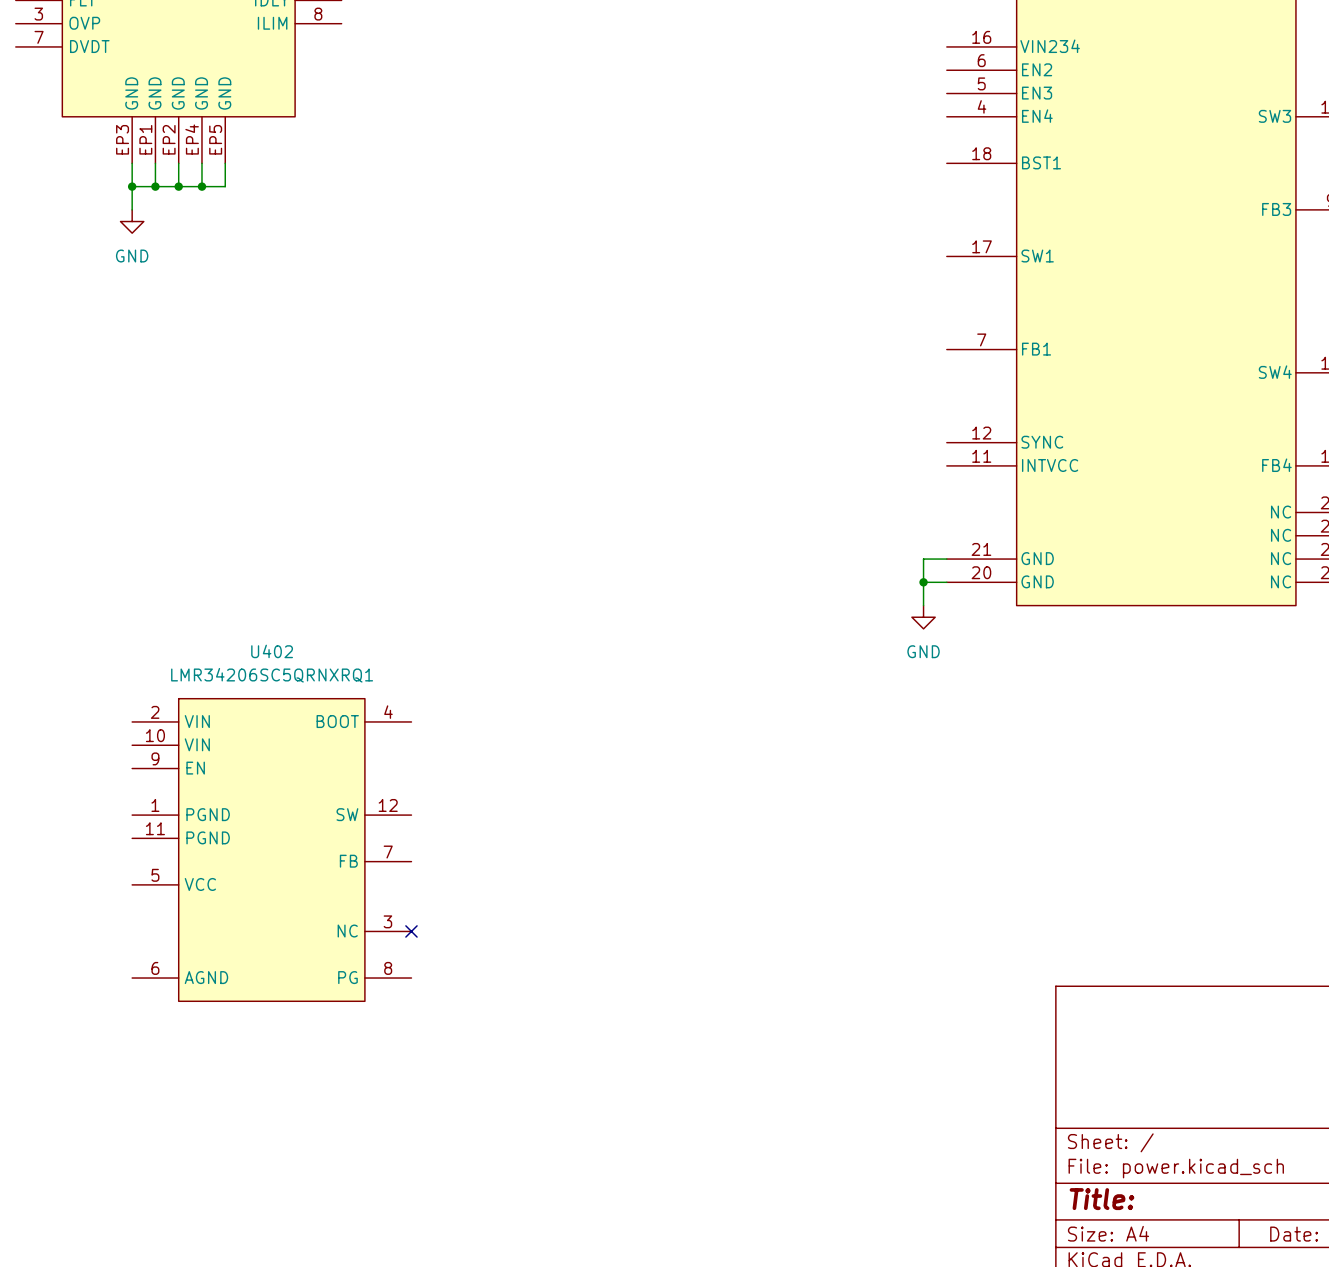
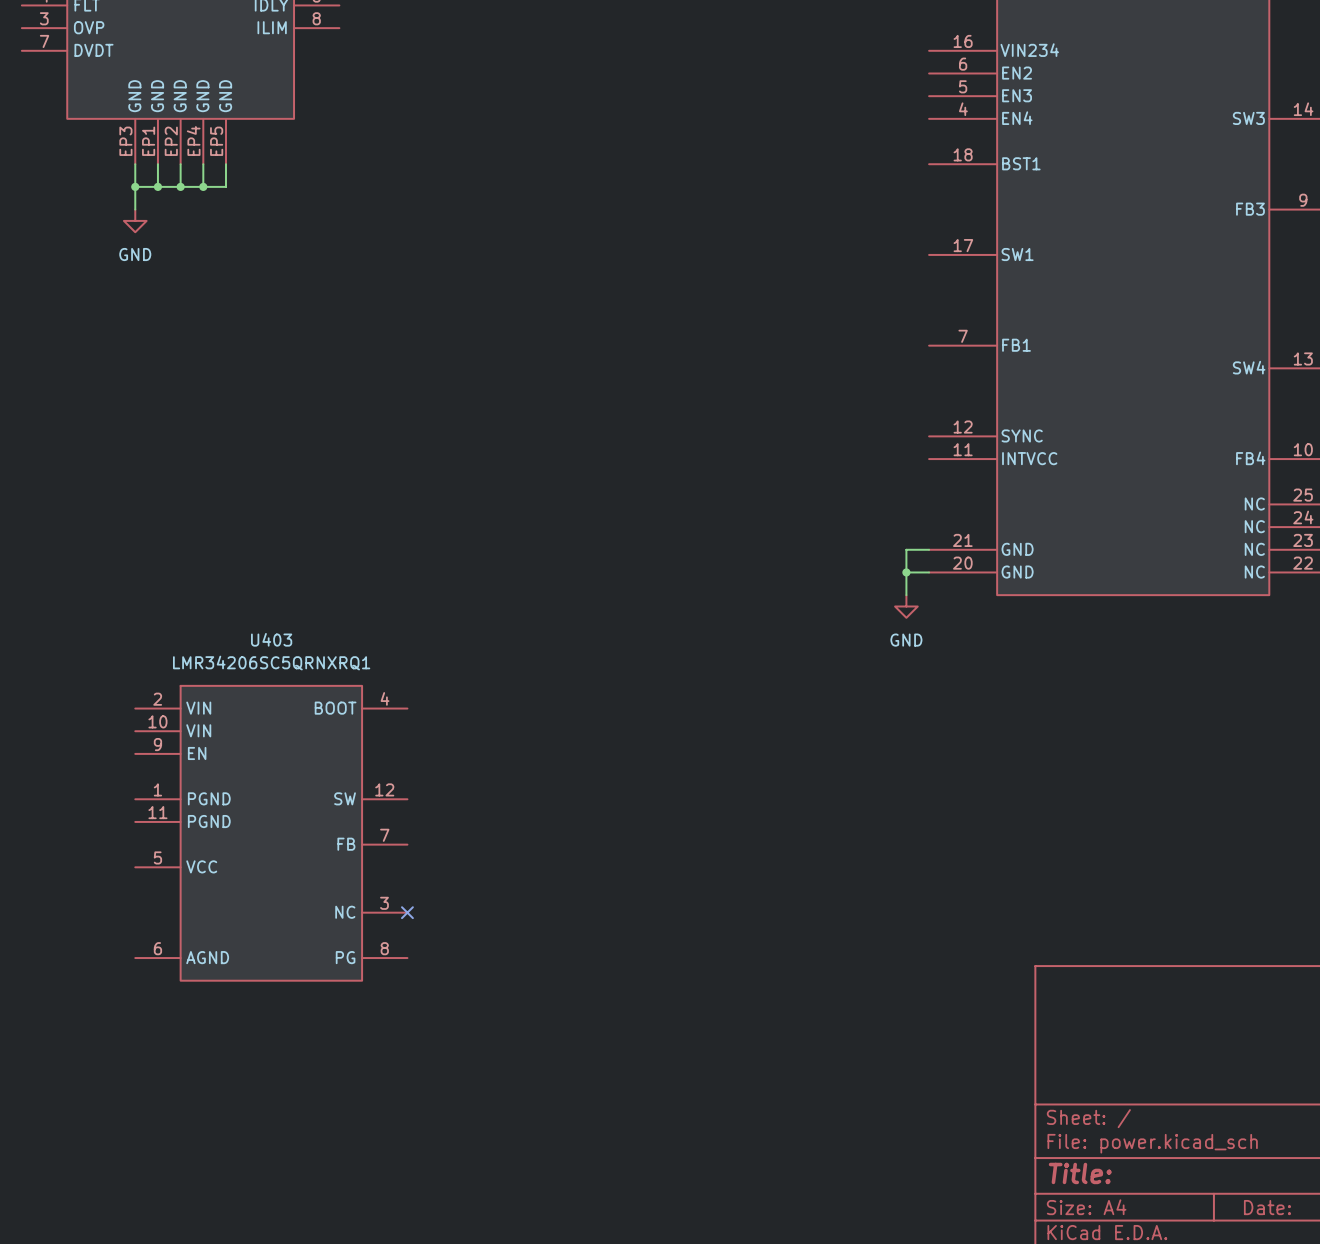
U402 name: U402 (272, 651) -> U403 (271, 639)

